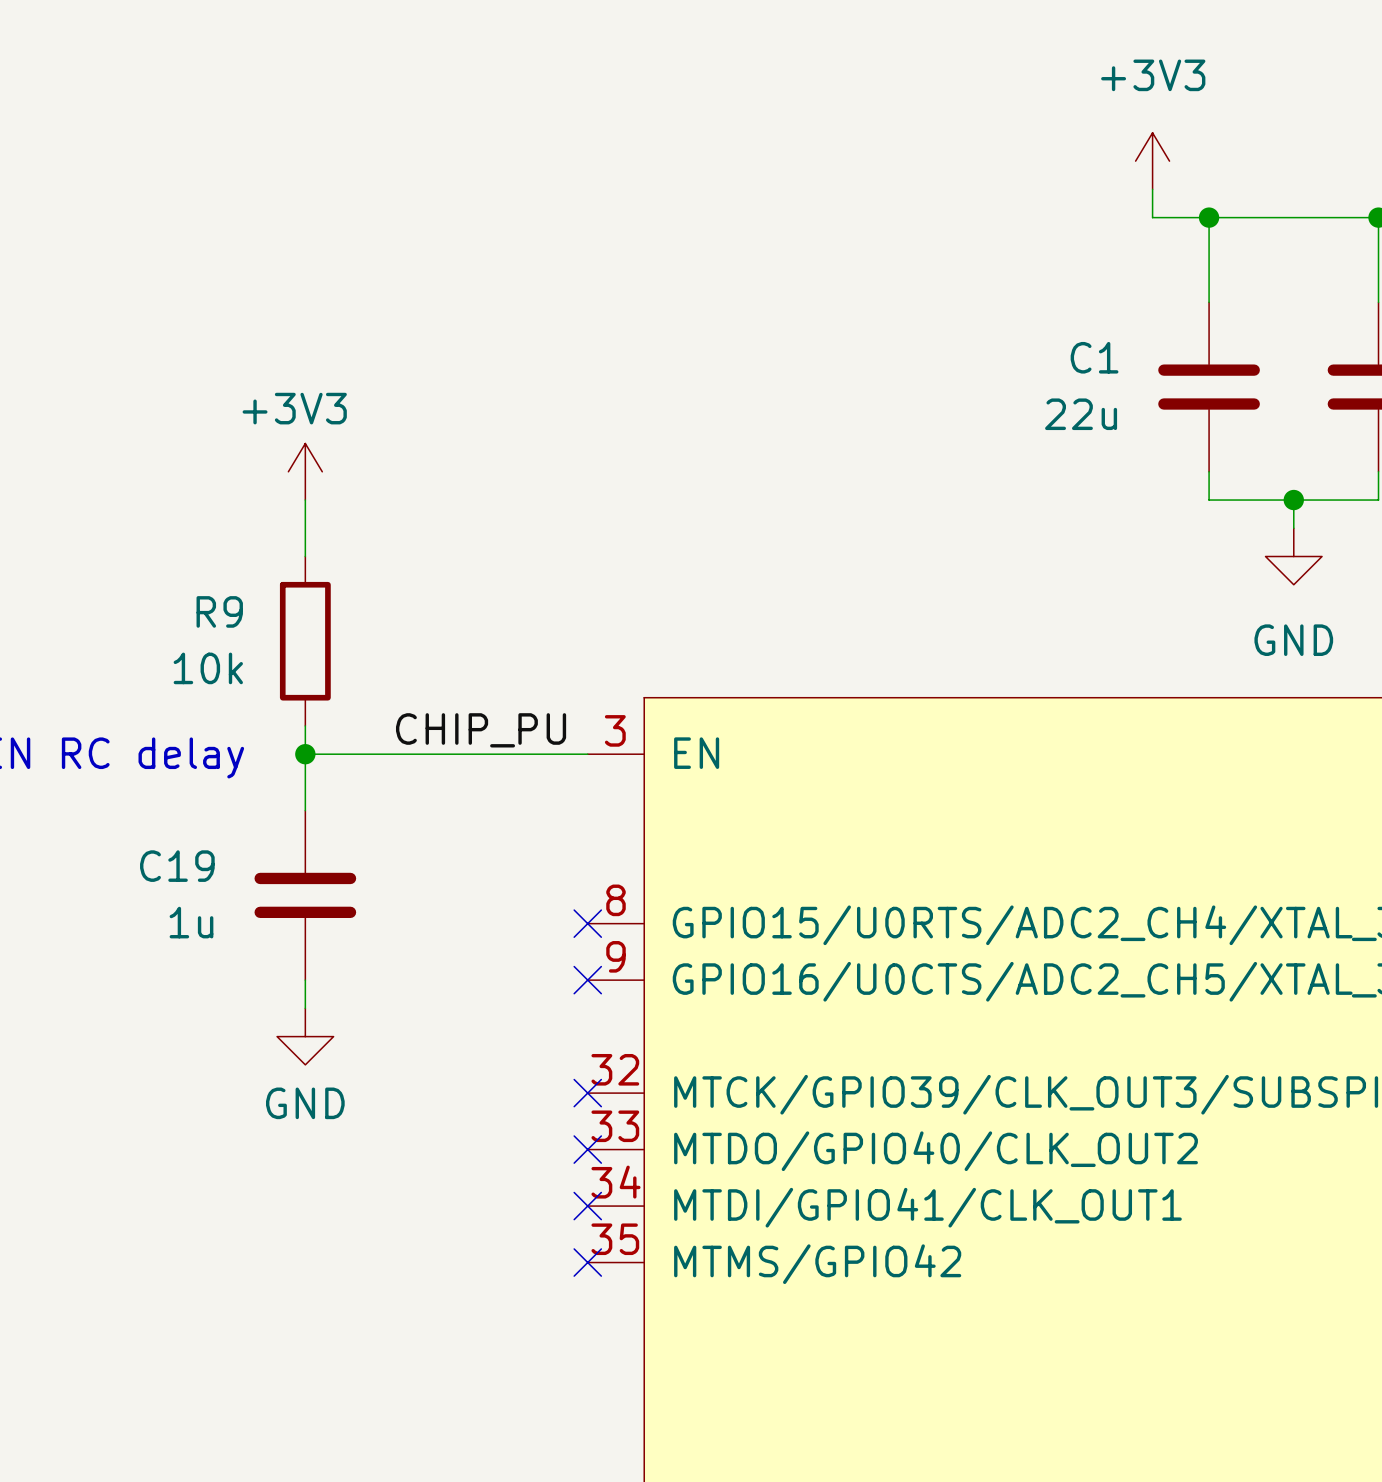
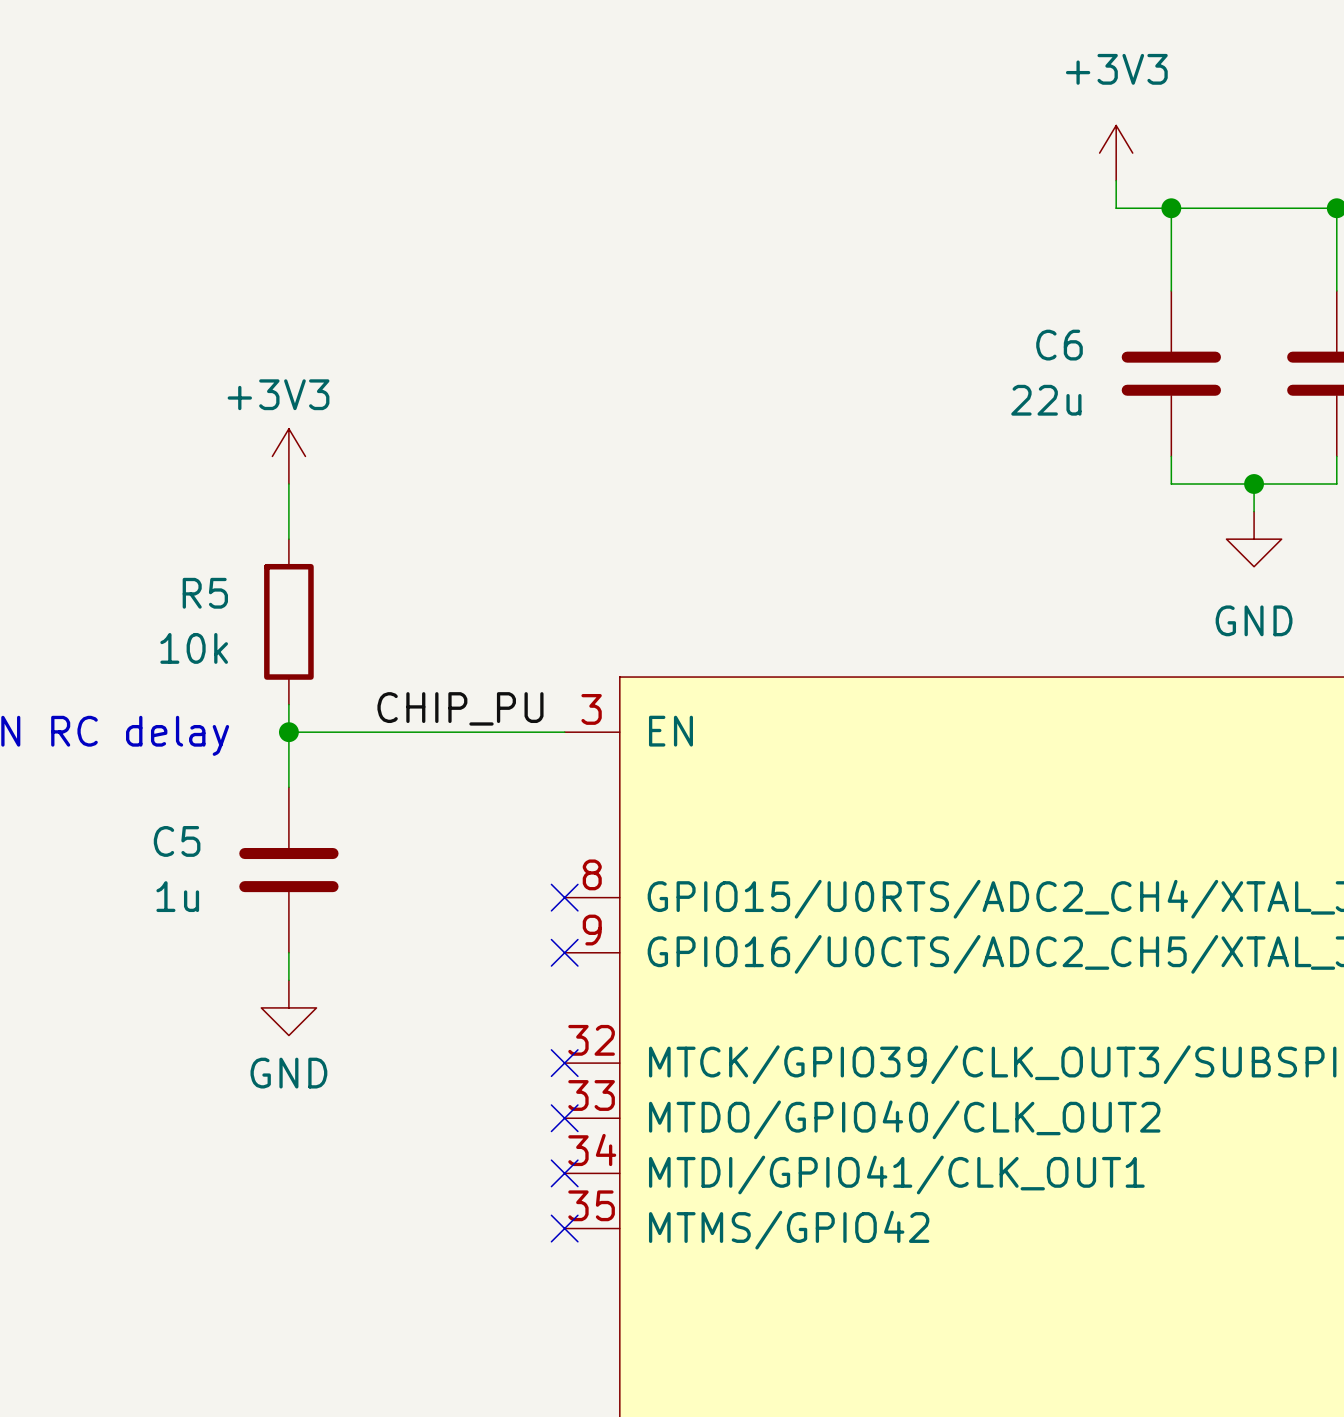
C1 name: C1 (1094, 357) -> C6 (1059, 345)
R9 name: R9 (219, 611) -> R5 (205, 593)
C19 name: C19 (177, 866) -> C5 (177, 841)

